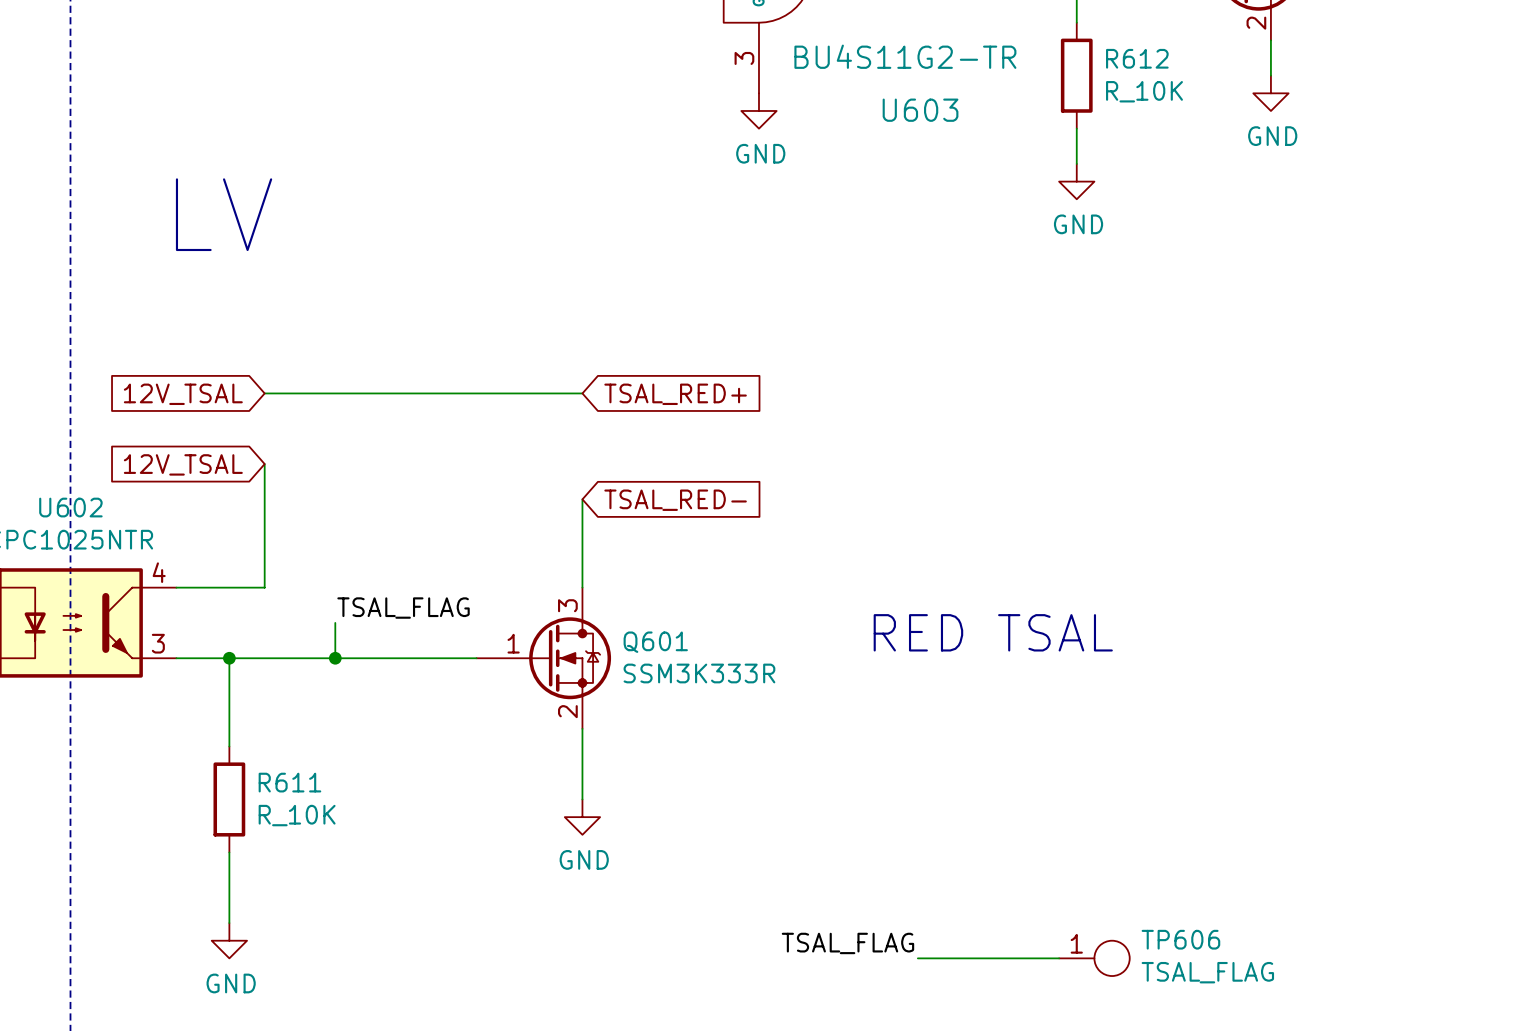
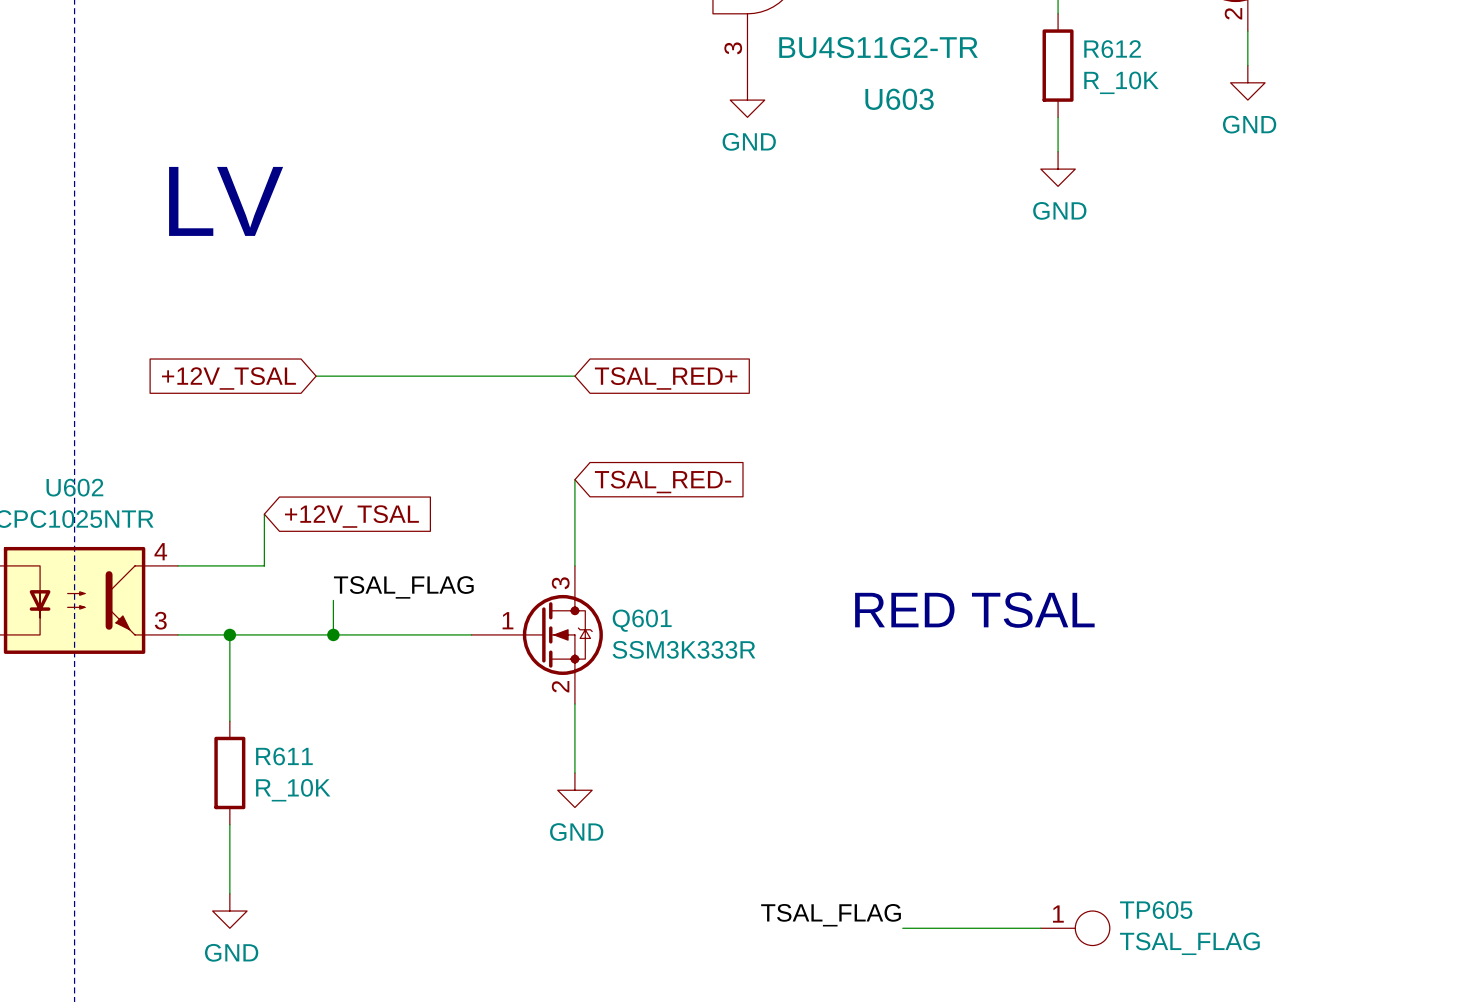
wire: (264, 393) (317, 393) -> none
global label: 12V_TSAL (183, 394) -> +12V_TSAL (228, 378)
global label: 12V_TSAL (183, 464) -> none
wire: (264, 464) (264, 534) -> none
global label: none -> +12V_TSAL (351, 516)
TP606 name: TP606 (1180, 939) -> TP605 (1156, 910)

